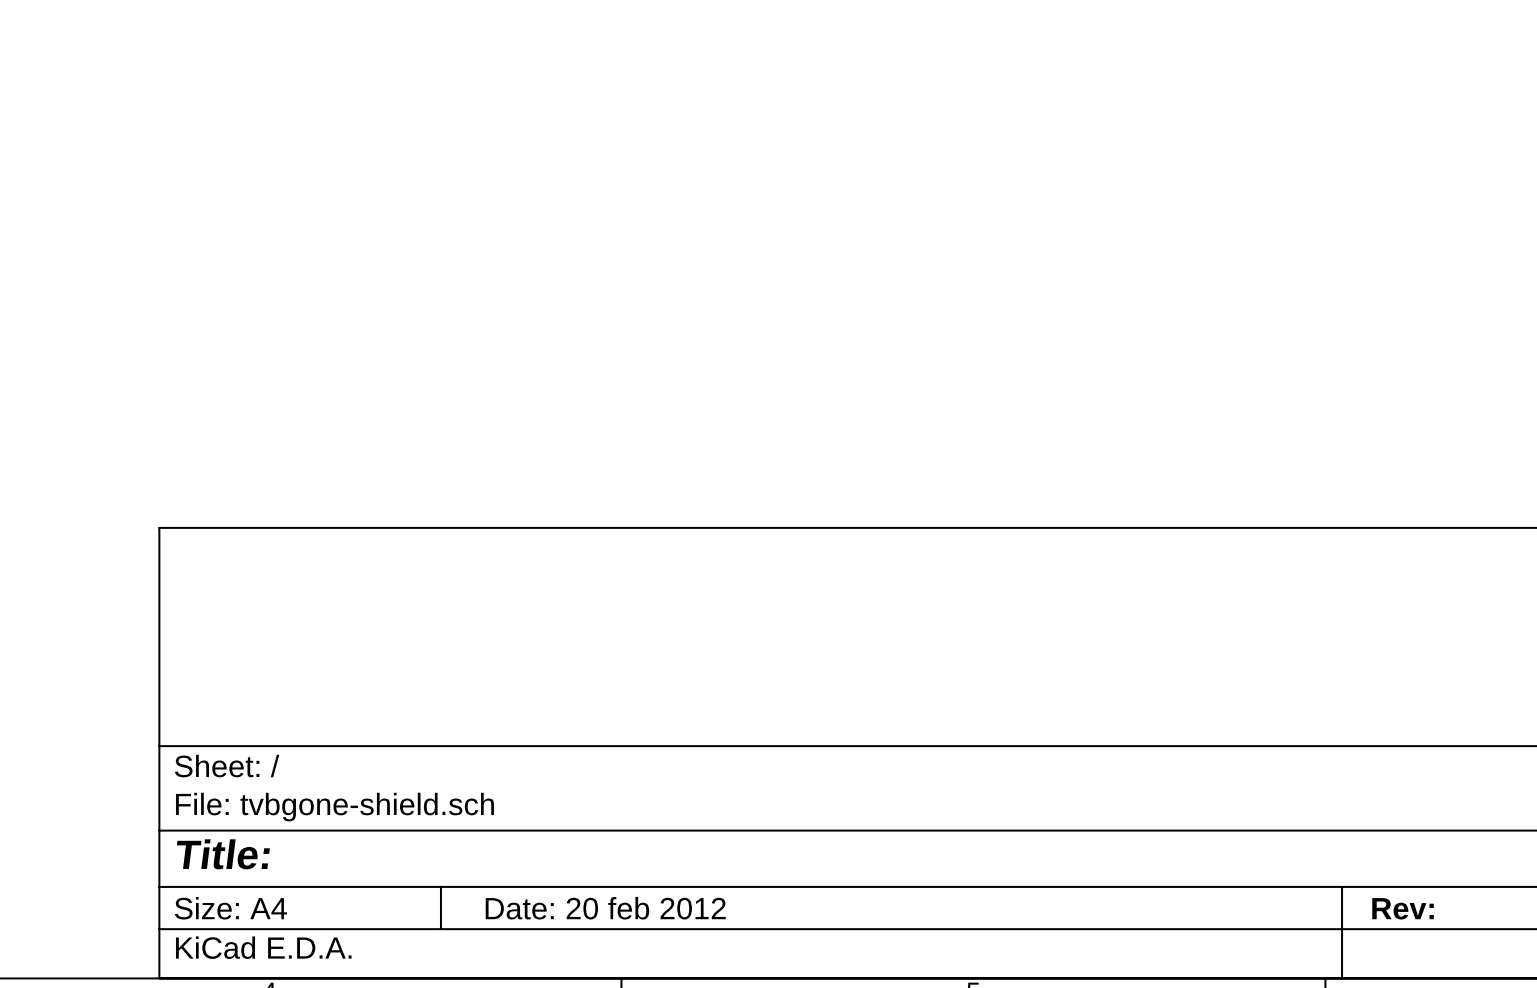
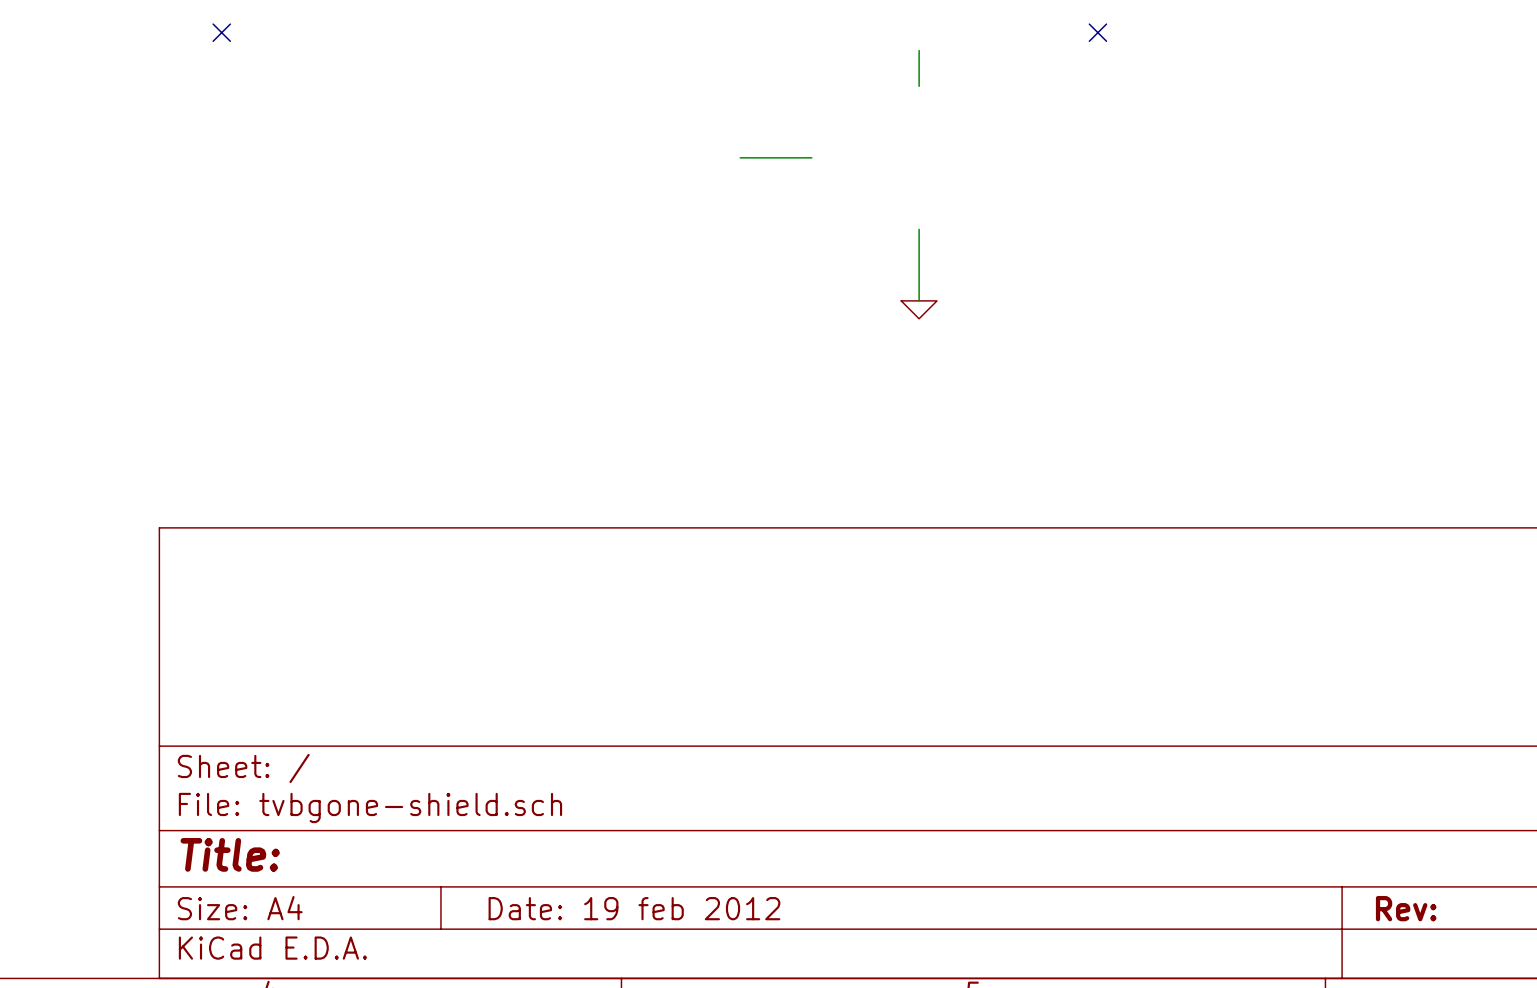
no-connect mark: none -> (221, 32)
no-connect mark: none -> (1097, 32)
wire: none -> (919, 50) (919, 86)
wire: none -> (740, 157) (811, 157)
wire: none -> (919, 229) (919, 300)
power symbol: none -> (919, 309)
title block: Date: 20 feb 2012 (605, 908) -> Date: 19 feb 2012 (634, 908)

